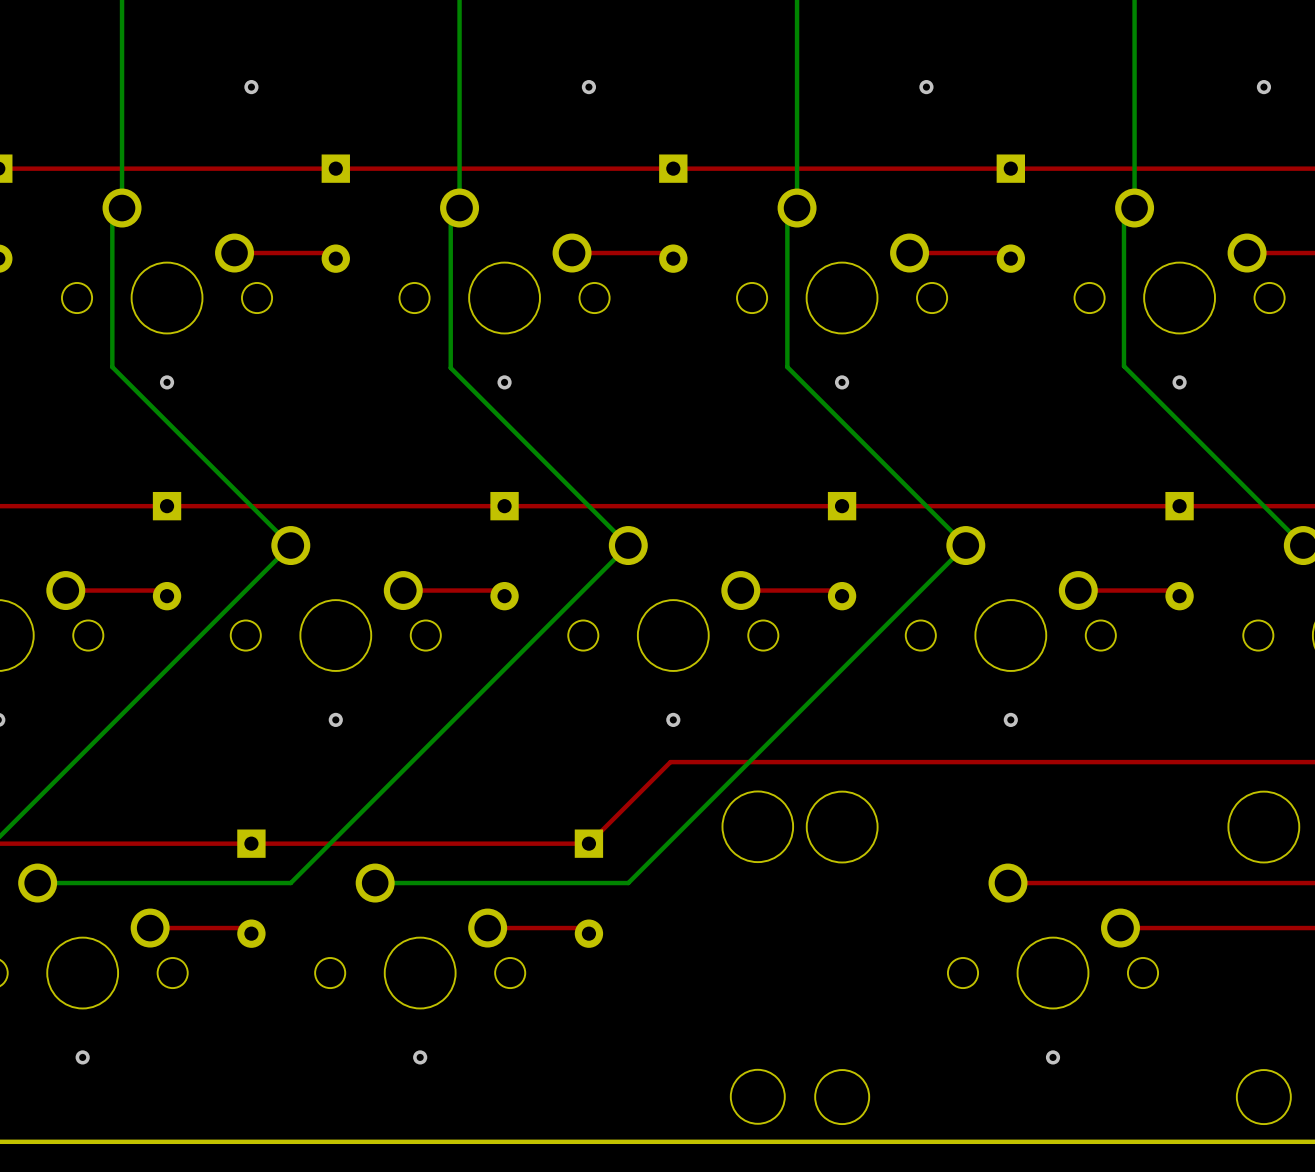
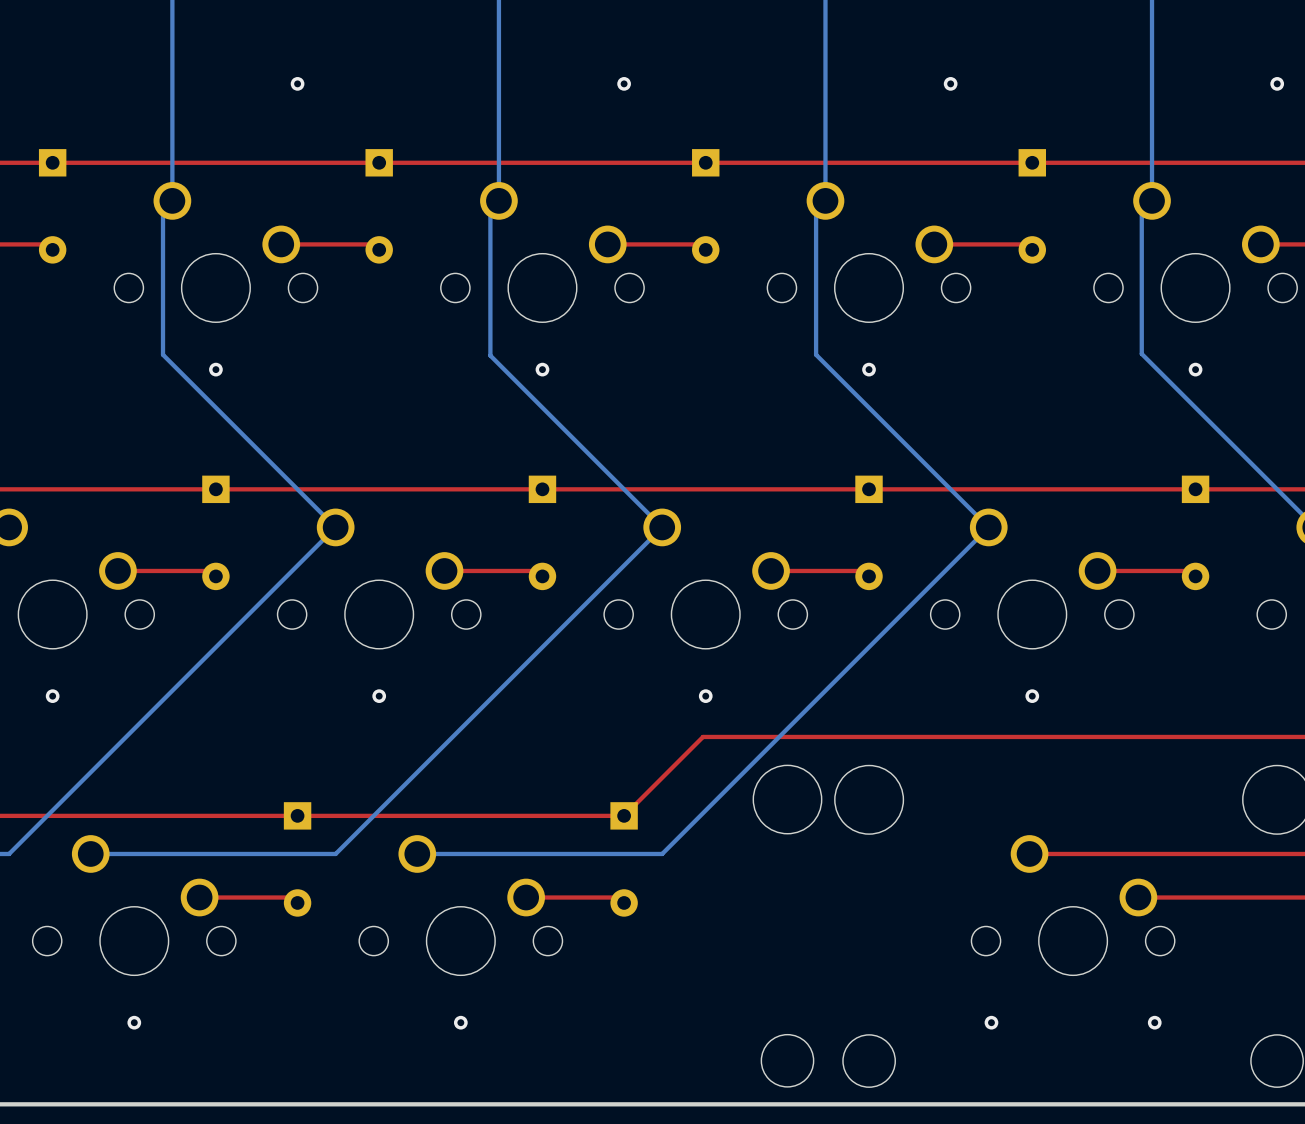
via: none -> (991, 1022)
via: (1053, 1057) -> none
via: none -> (1154, 1022)

